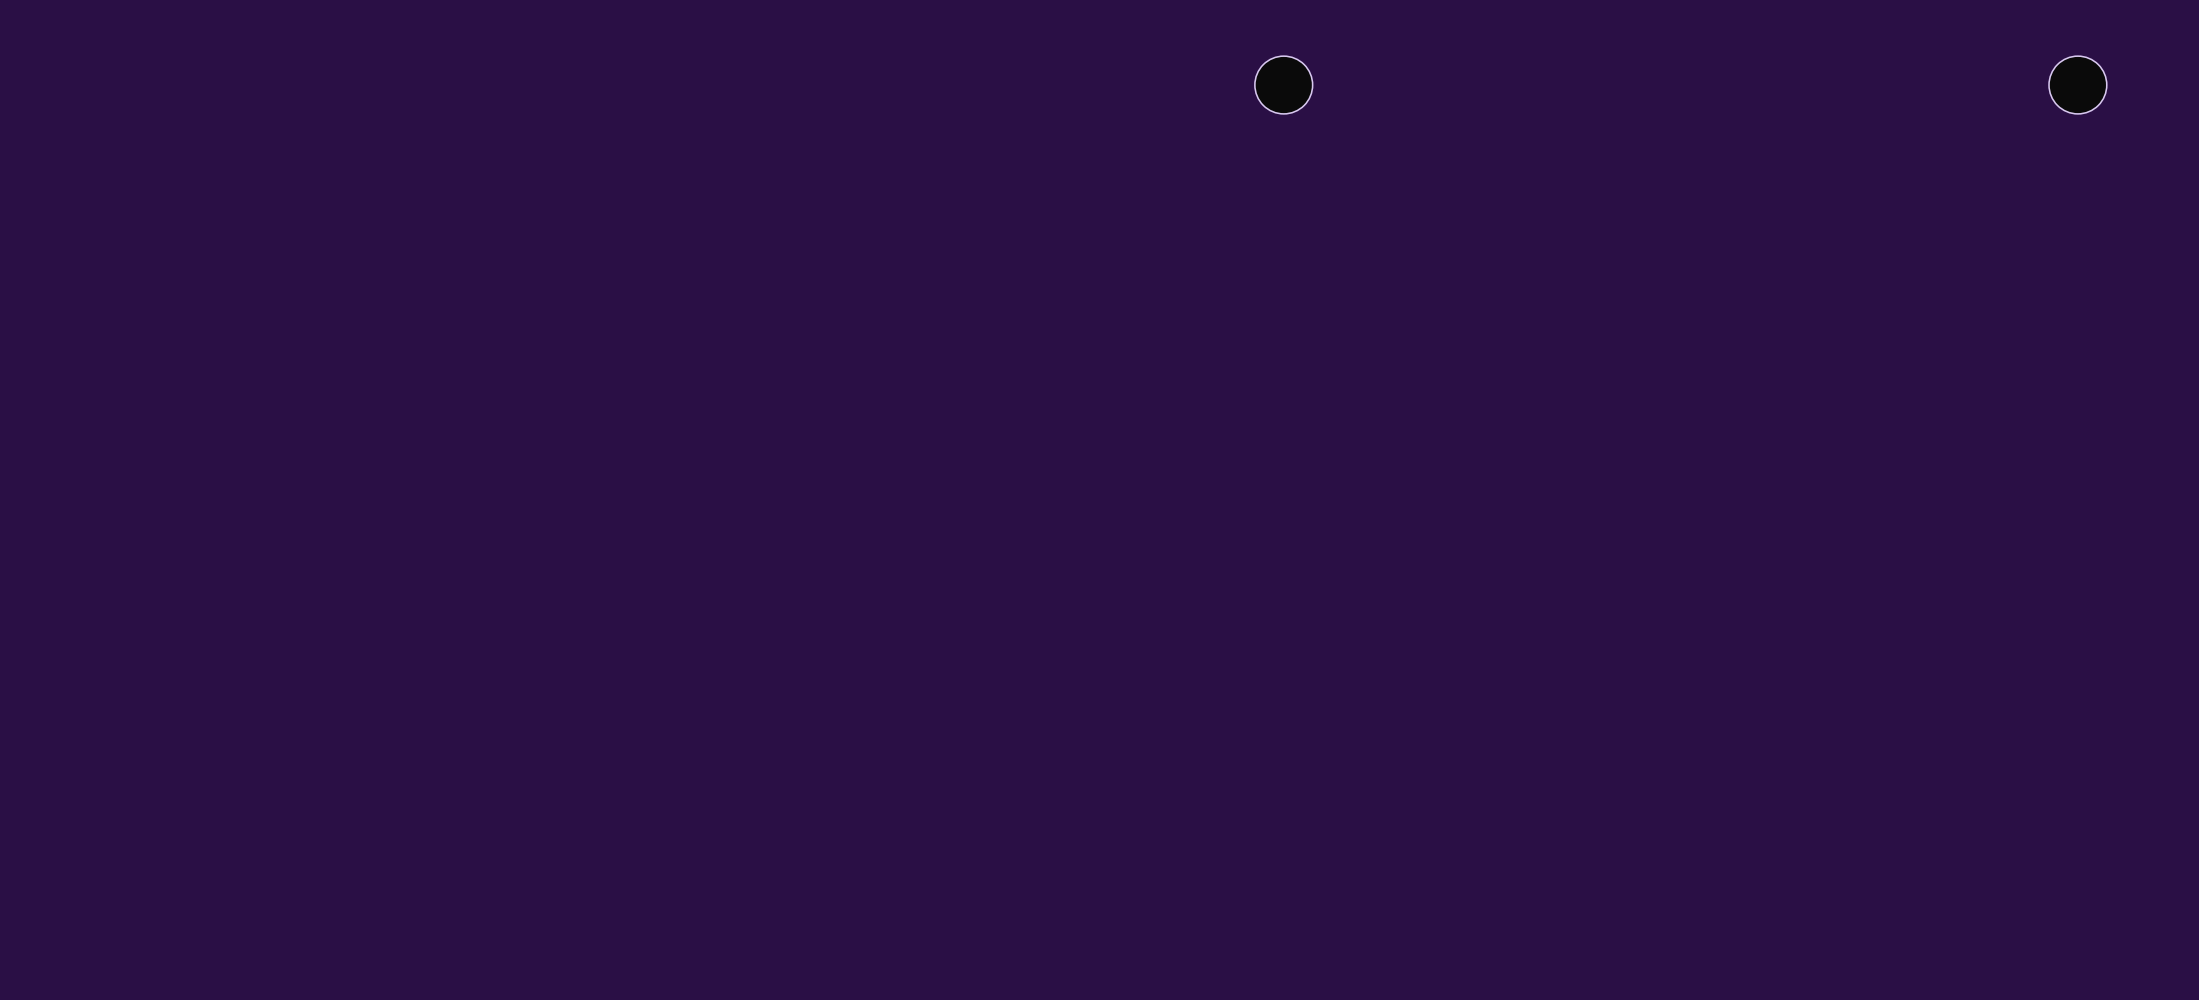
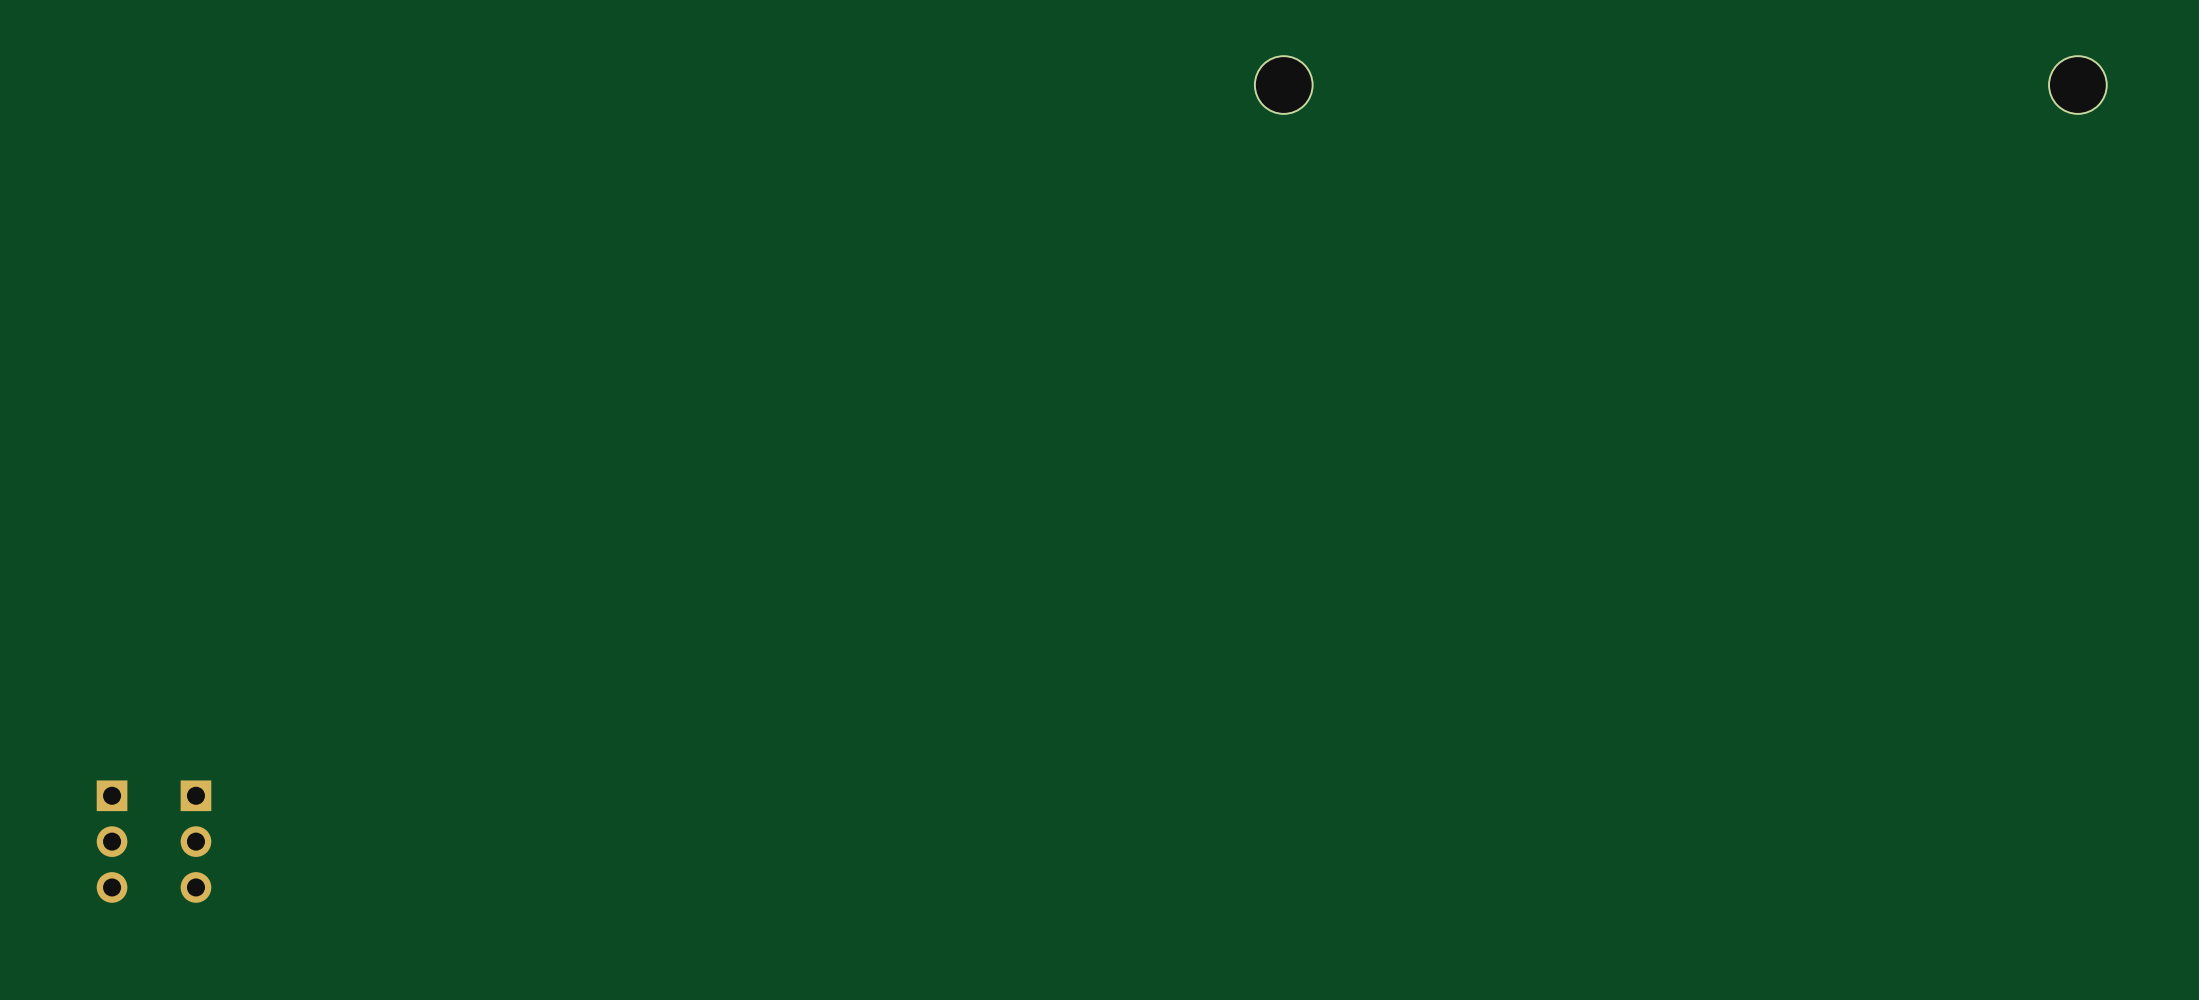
part: none -> (112, 841)
part: none -> (195, 841)

